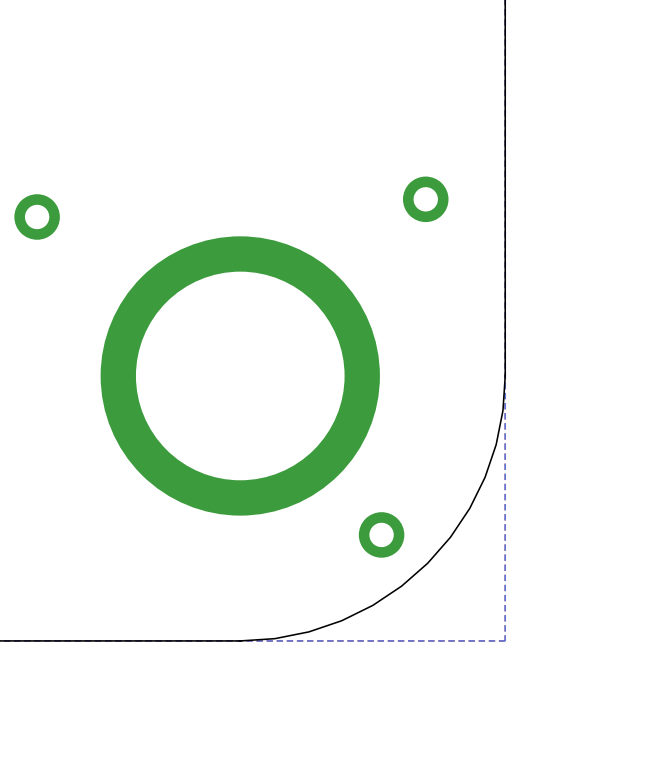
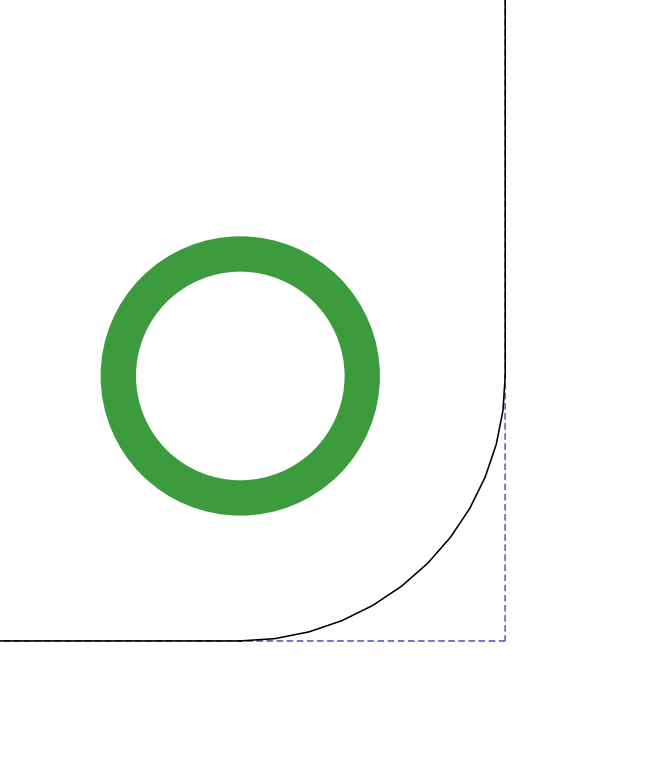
via: (425, 199) -> none
via: (37, 216) -> none
via: (381, 534) -> none

